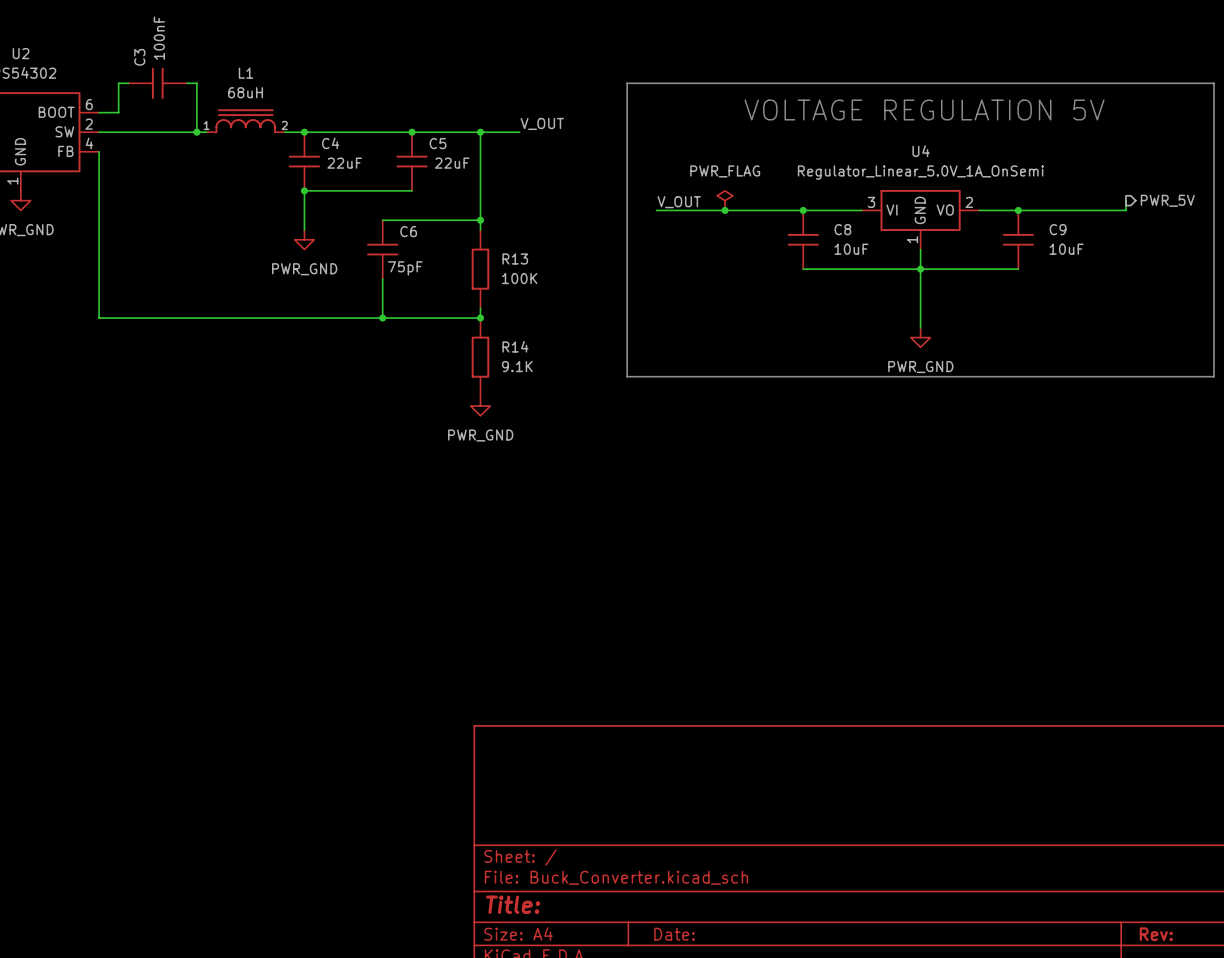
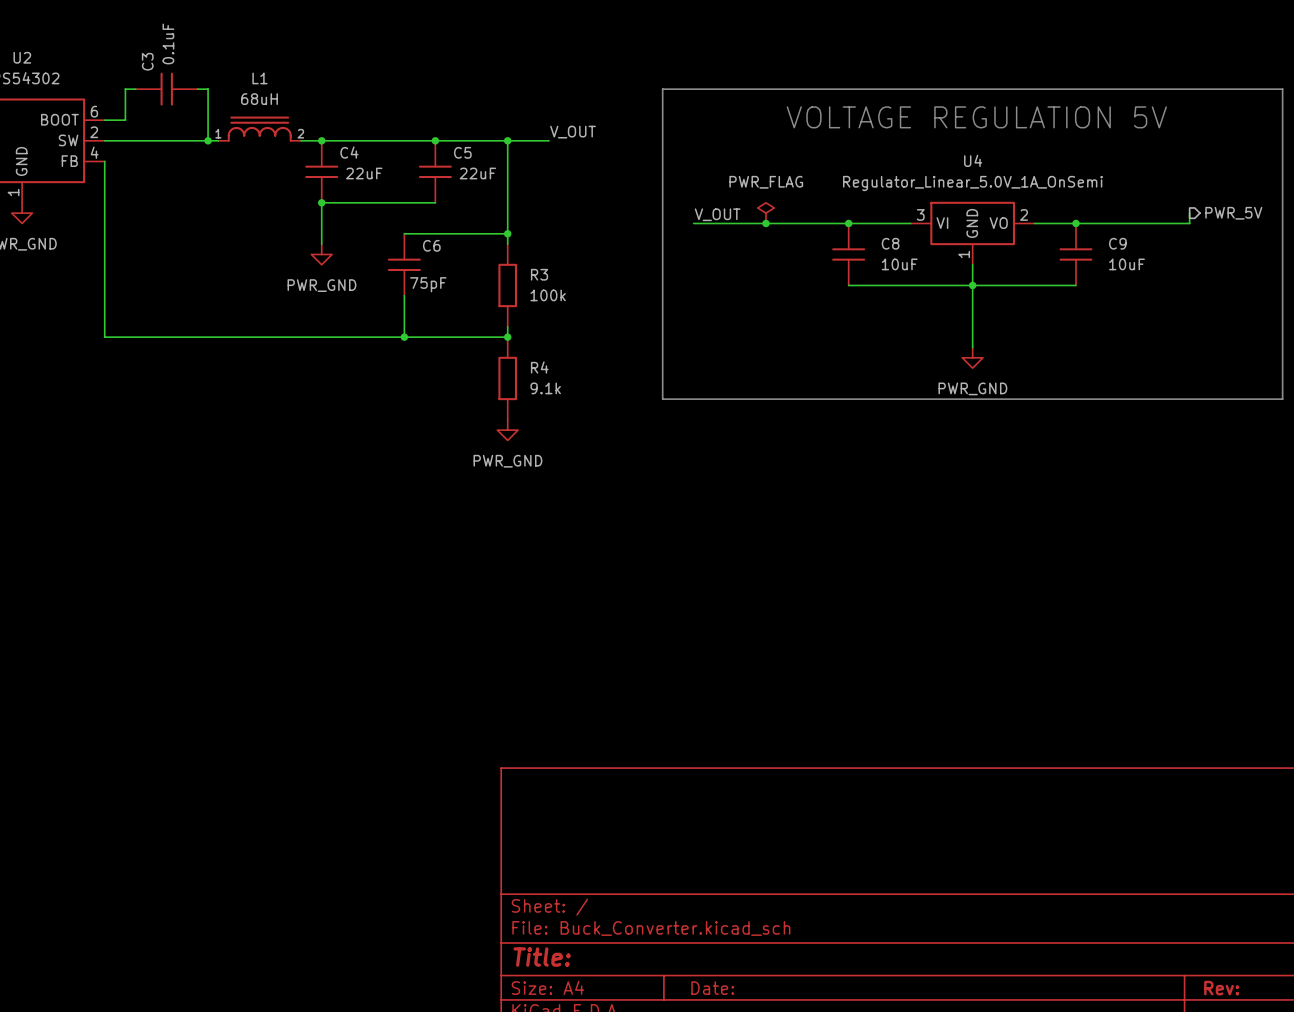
C3 value: 100nF (159, 38) -> 0.1uF (168, 43)
R13 name: R13 (515, 258) -> R3 (539, 274)
R13 value: 100K (519, 278) -> 100k (548, 295)
R14 name: R14 (515, 346) -> R4 (539, 367)
R14 value: 9.1K (517, 366) -> 9.1k (545, 388)

